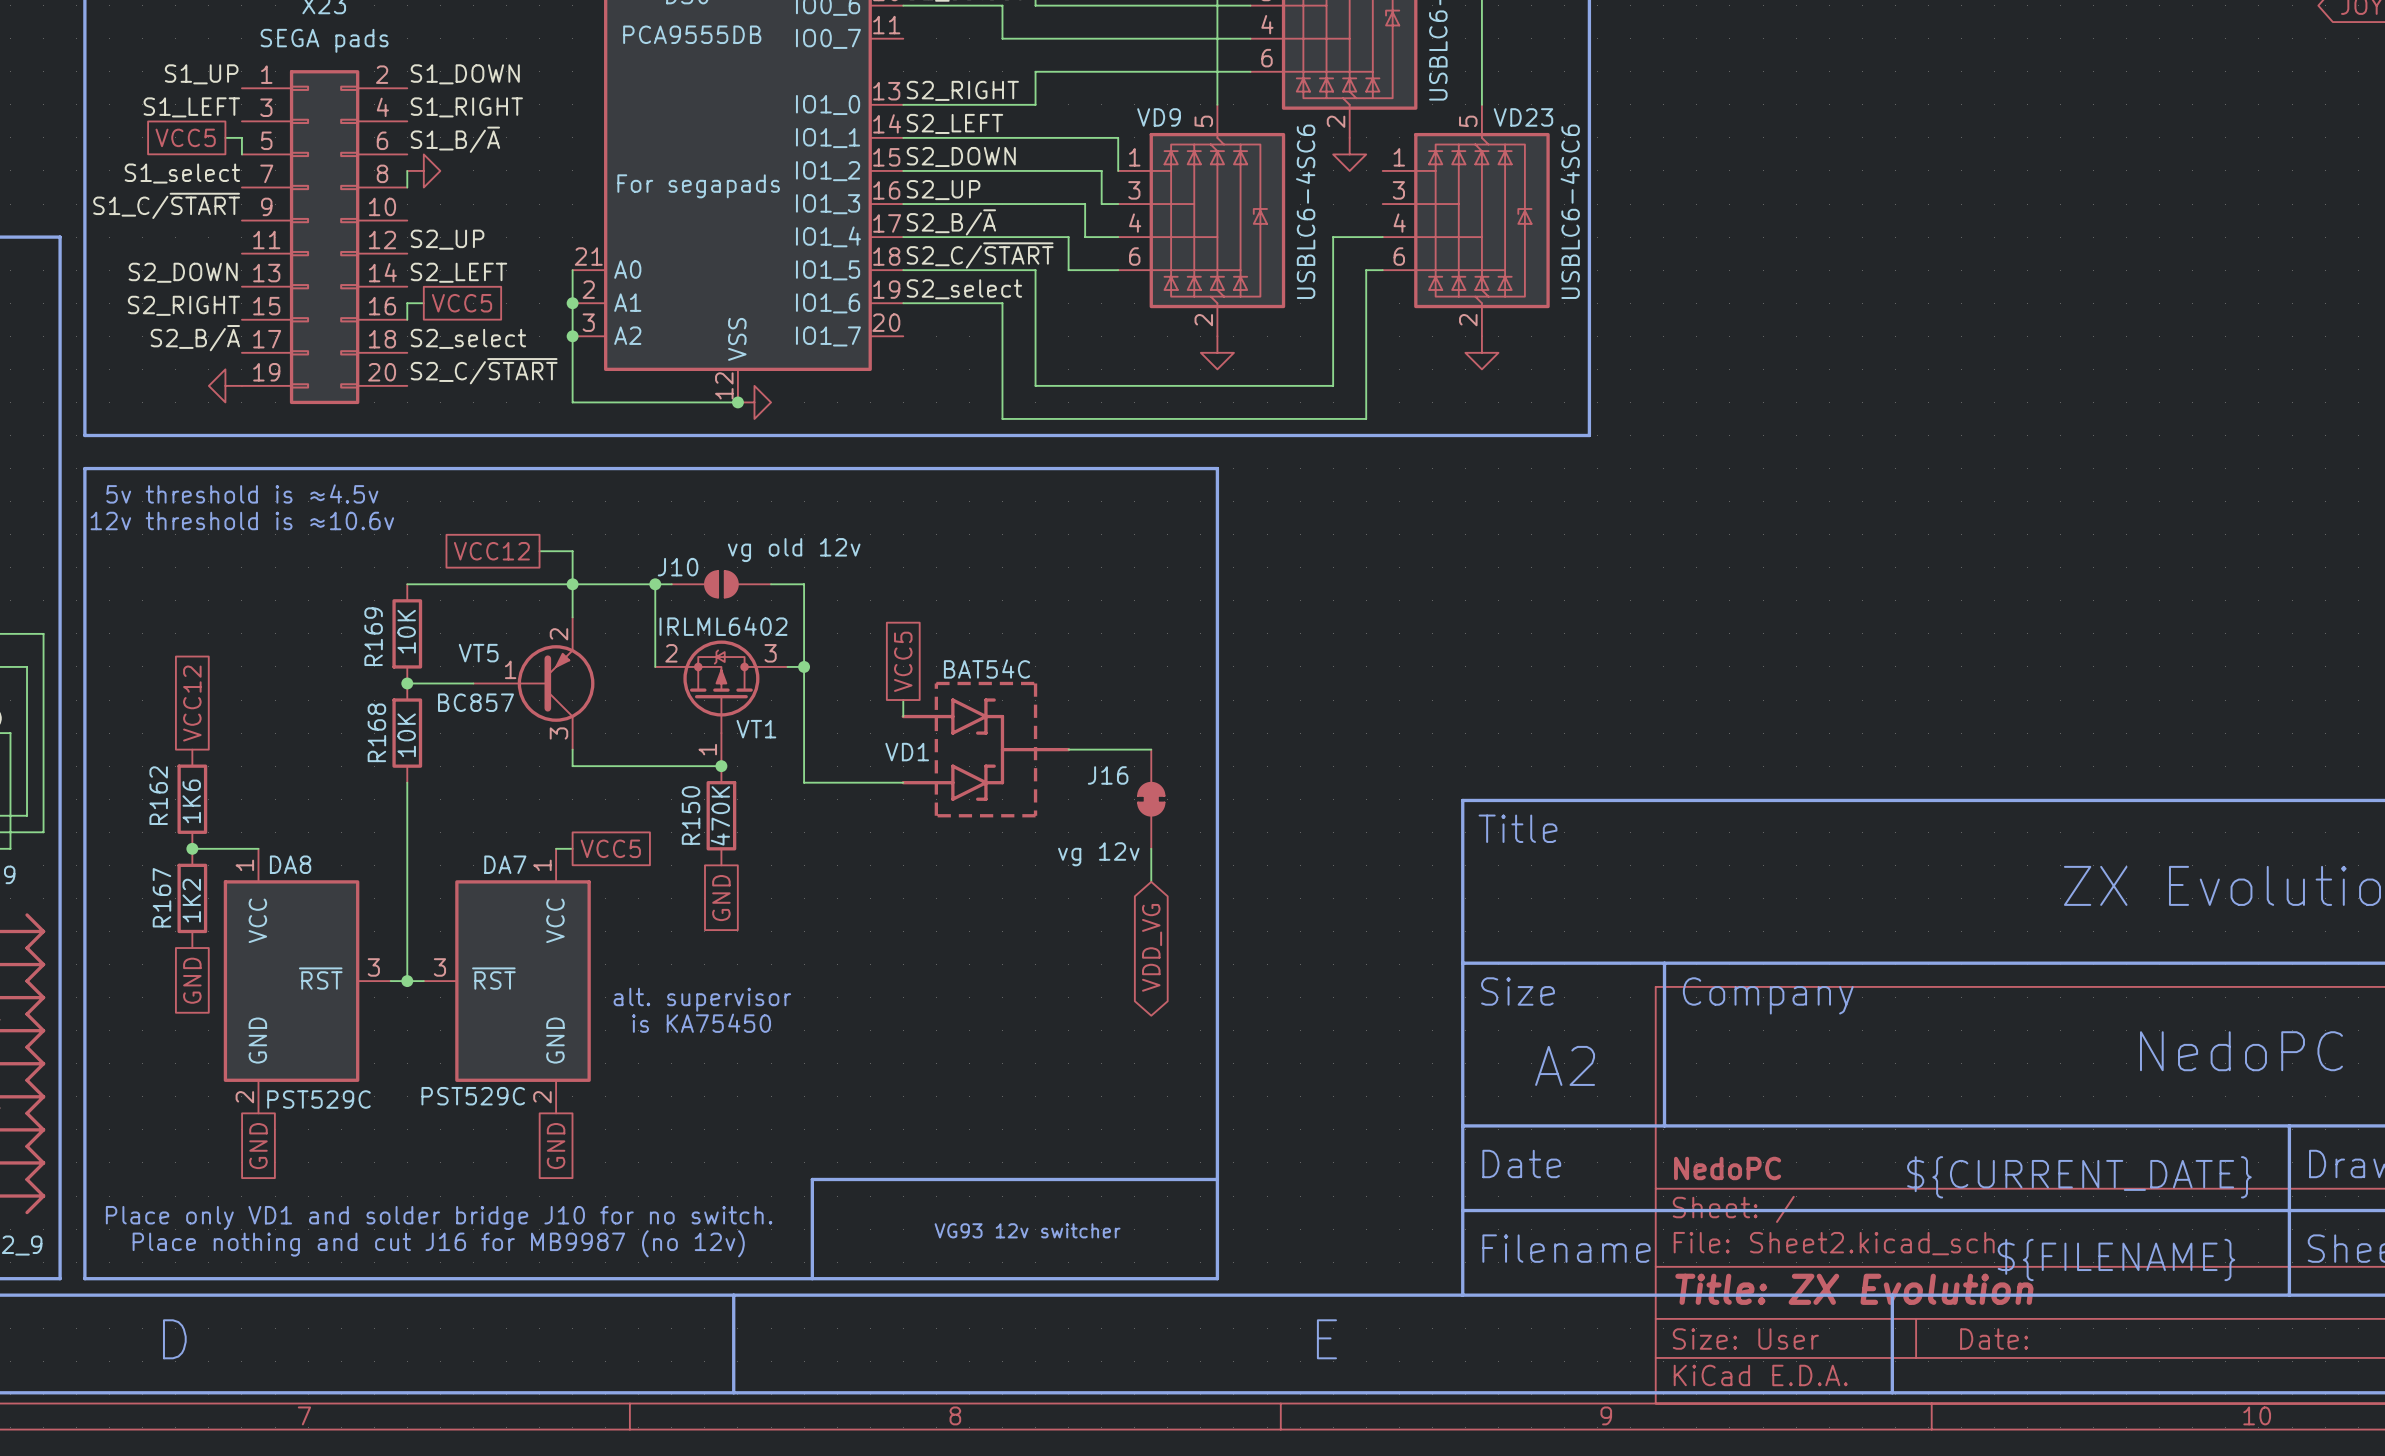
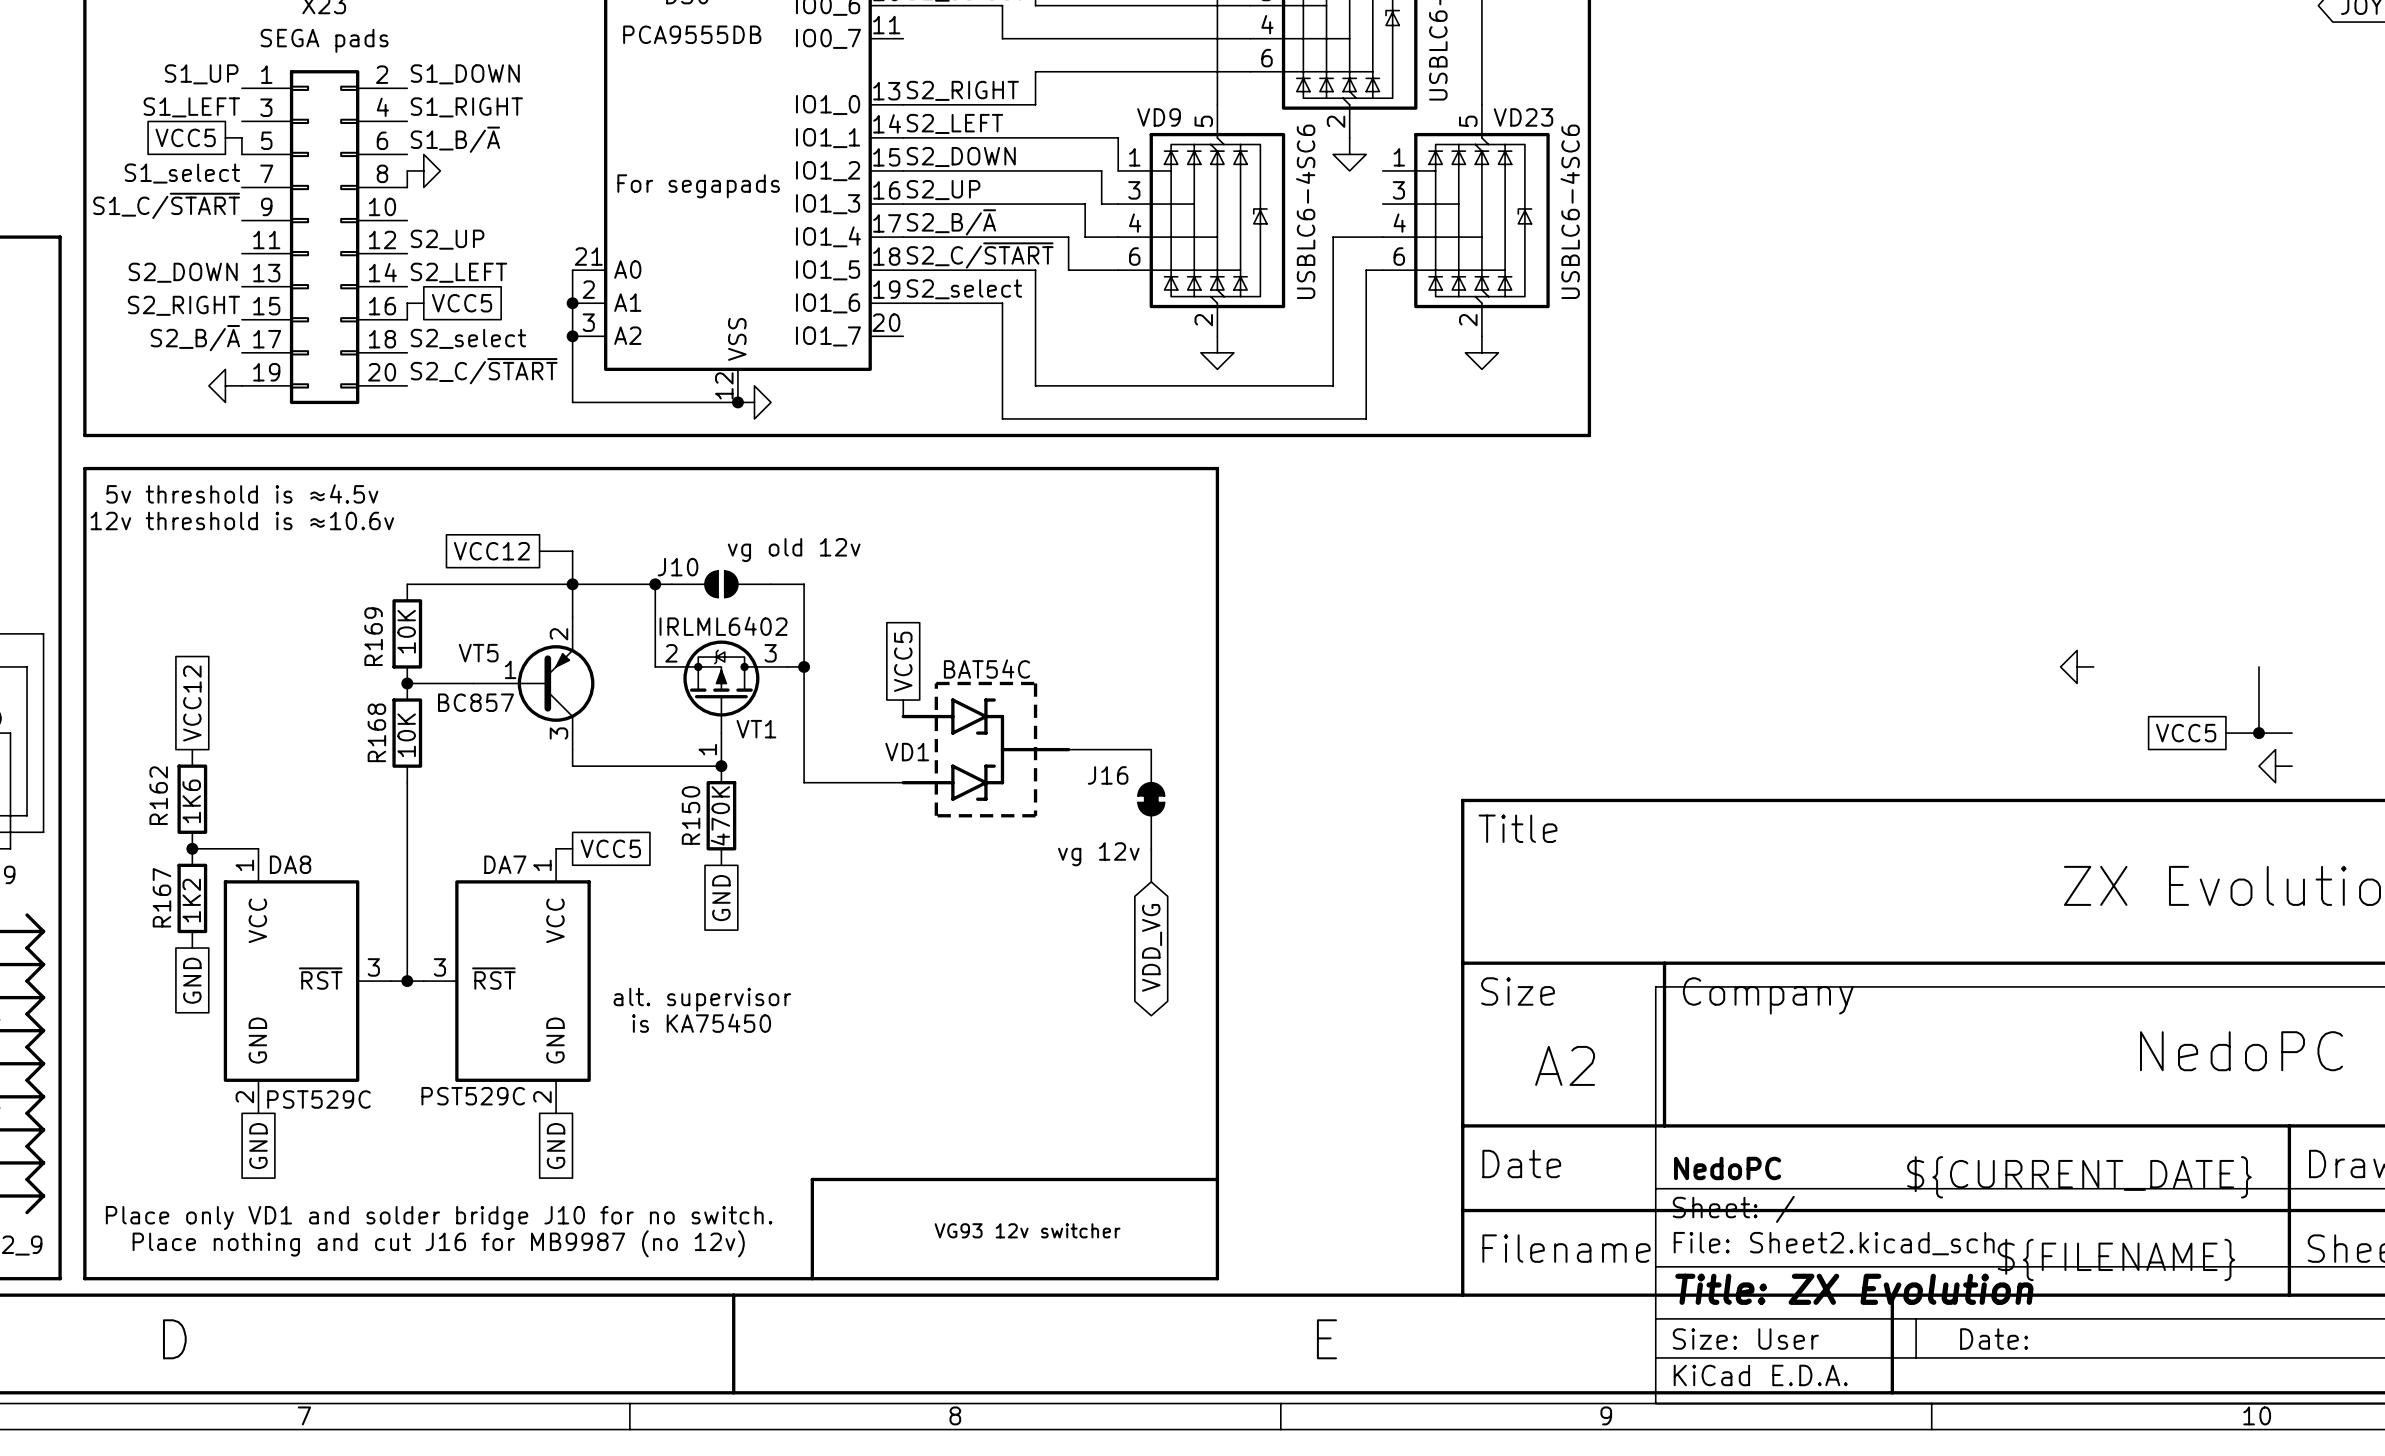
power symbol: none -> (2077, 666)
wire: none -> (2258, 666) (2258, 733)
global label: none -> VCC5 (2186, 733)
wire: none -> (2225, 733) (2292, 733)
junction: none -> (2258, 733)
power symbol: none -> (2275, 766)

